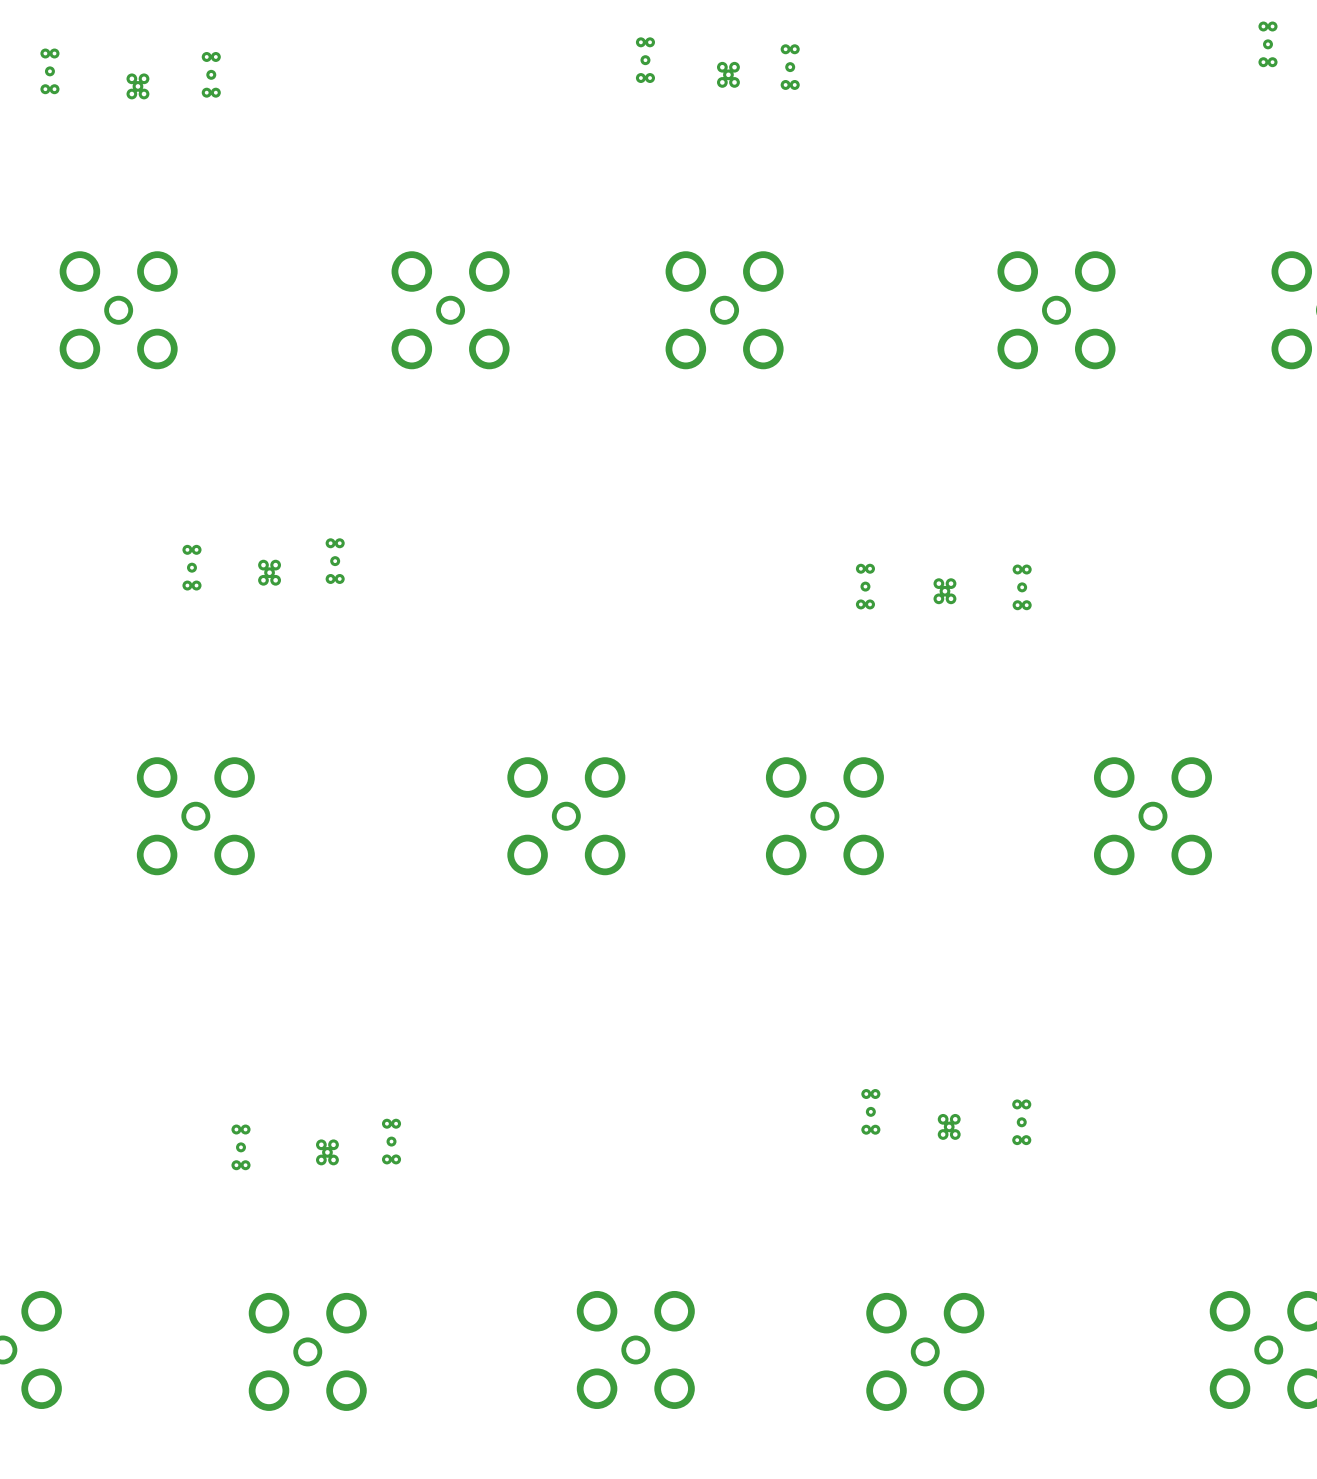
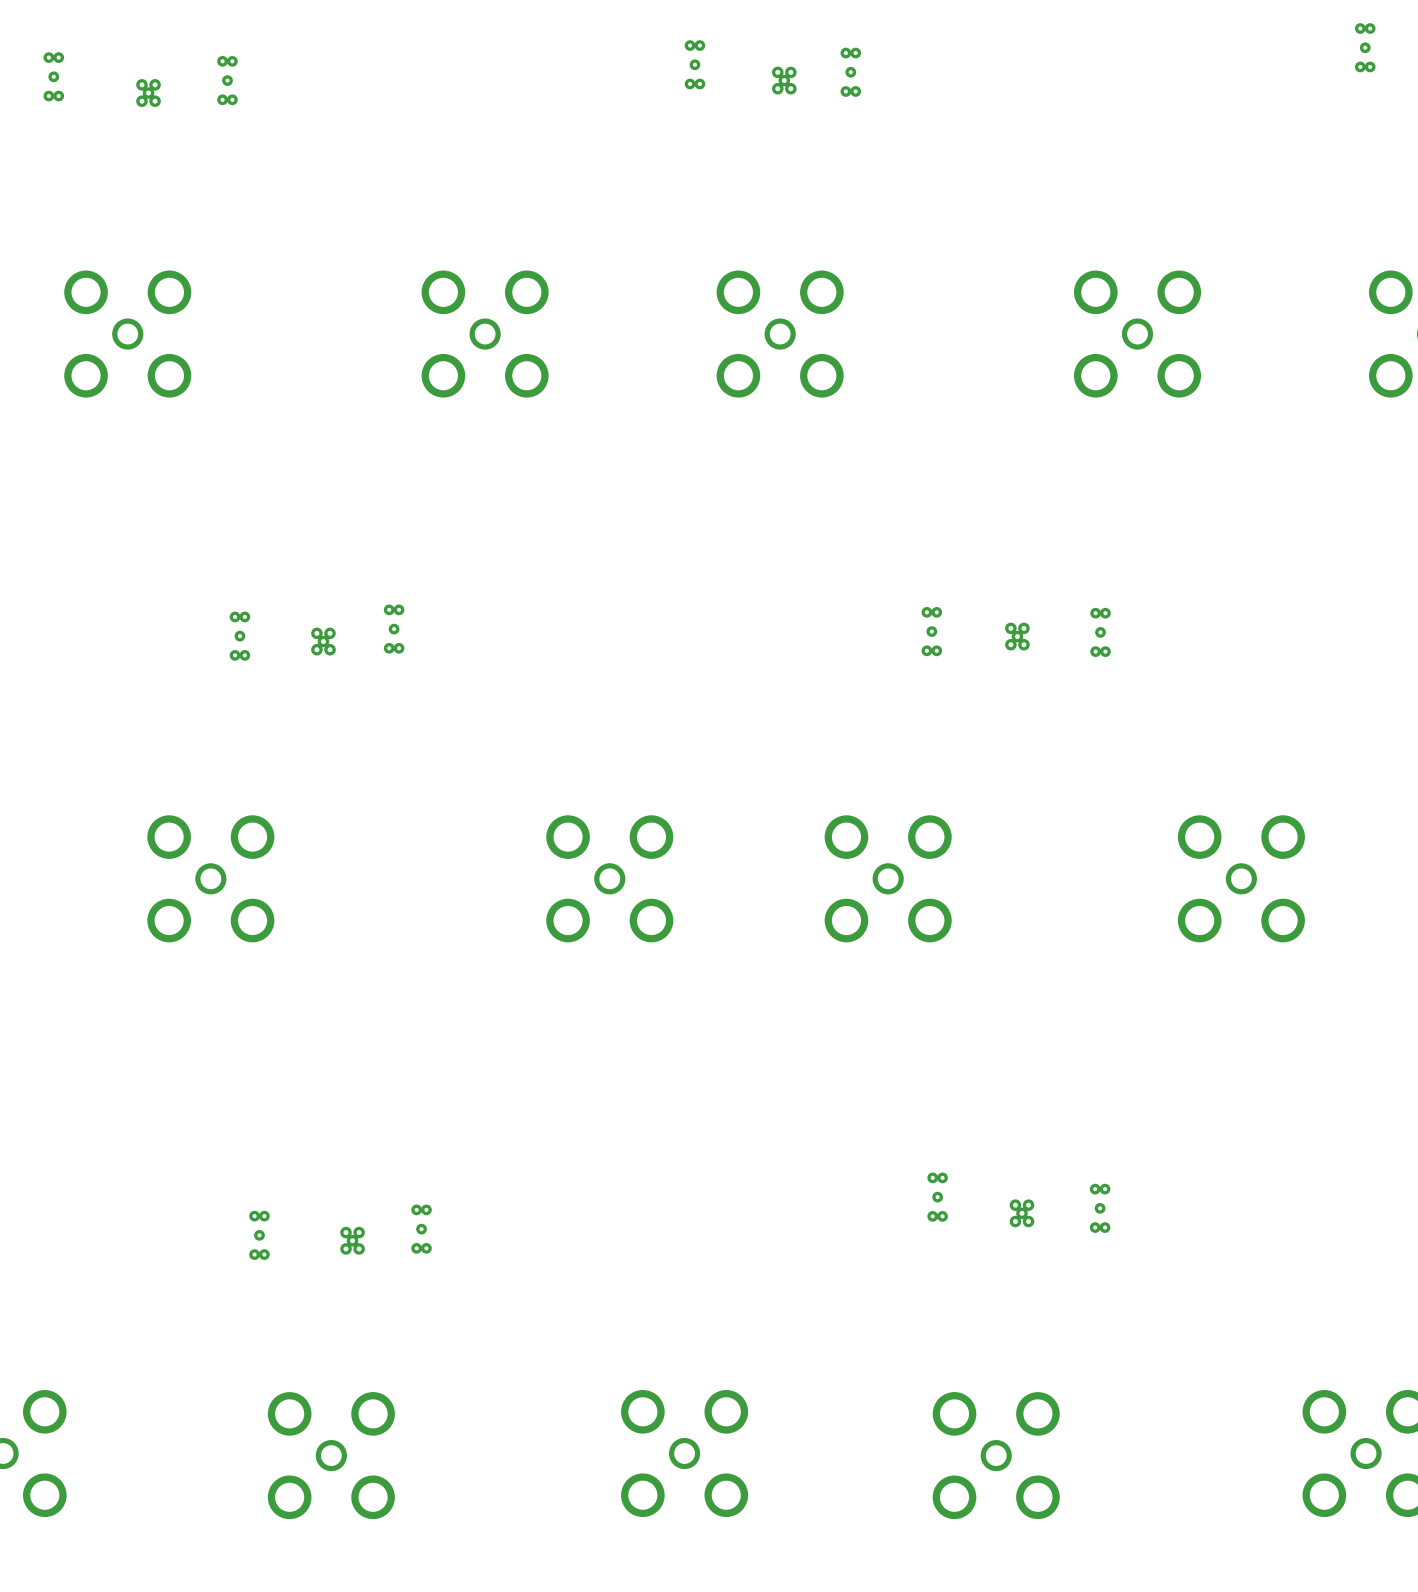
part position: (335, 561) -> (394, 629)
part position: (191, 567) -> (239, 636)
part position: (269, 572) -> (323, 641)

